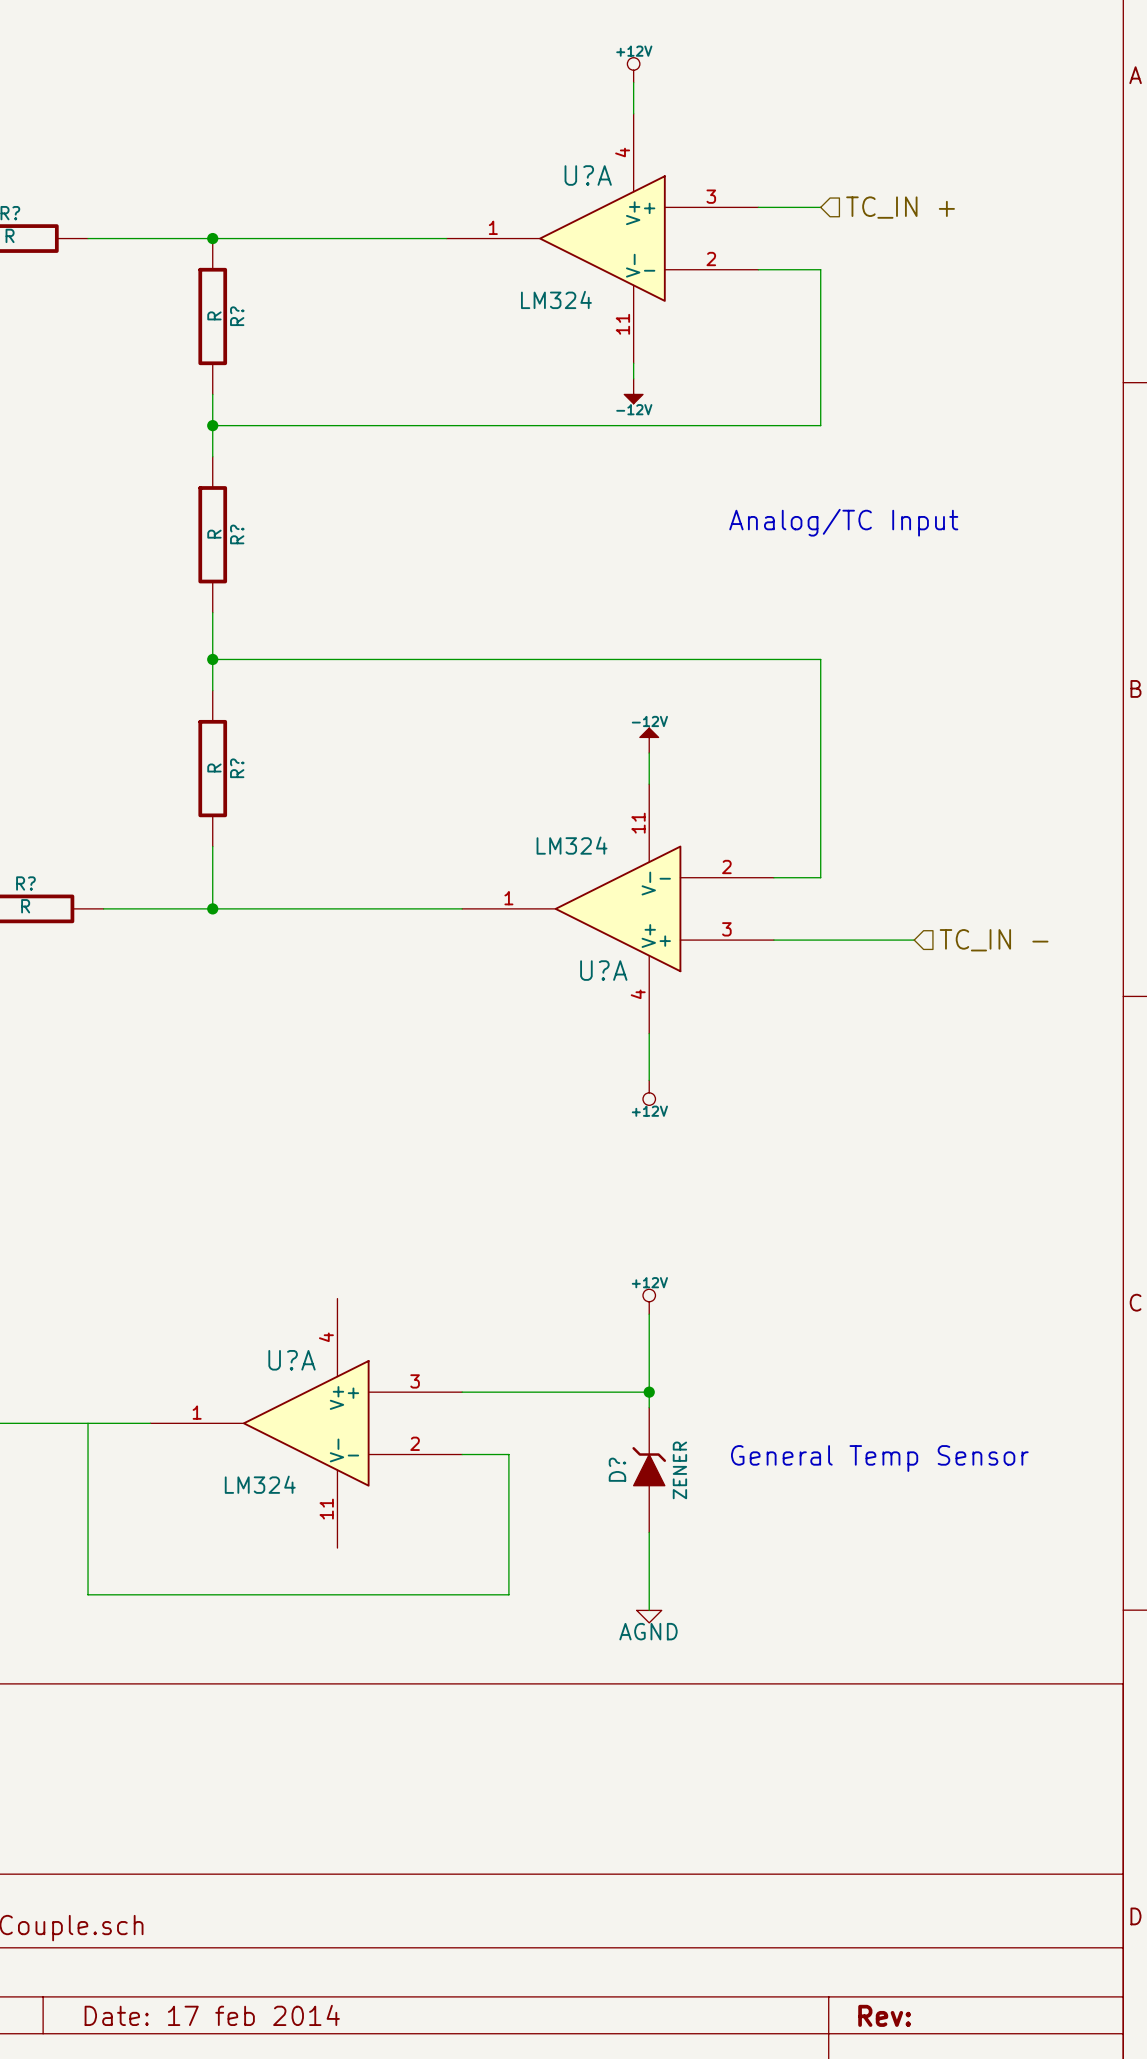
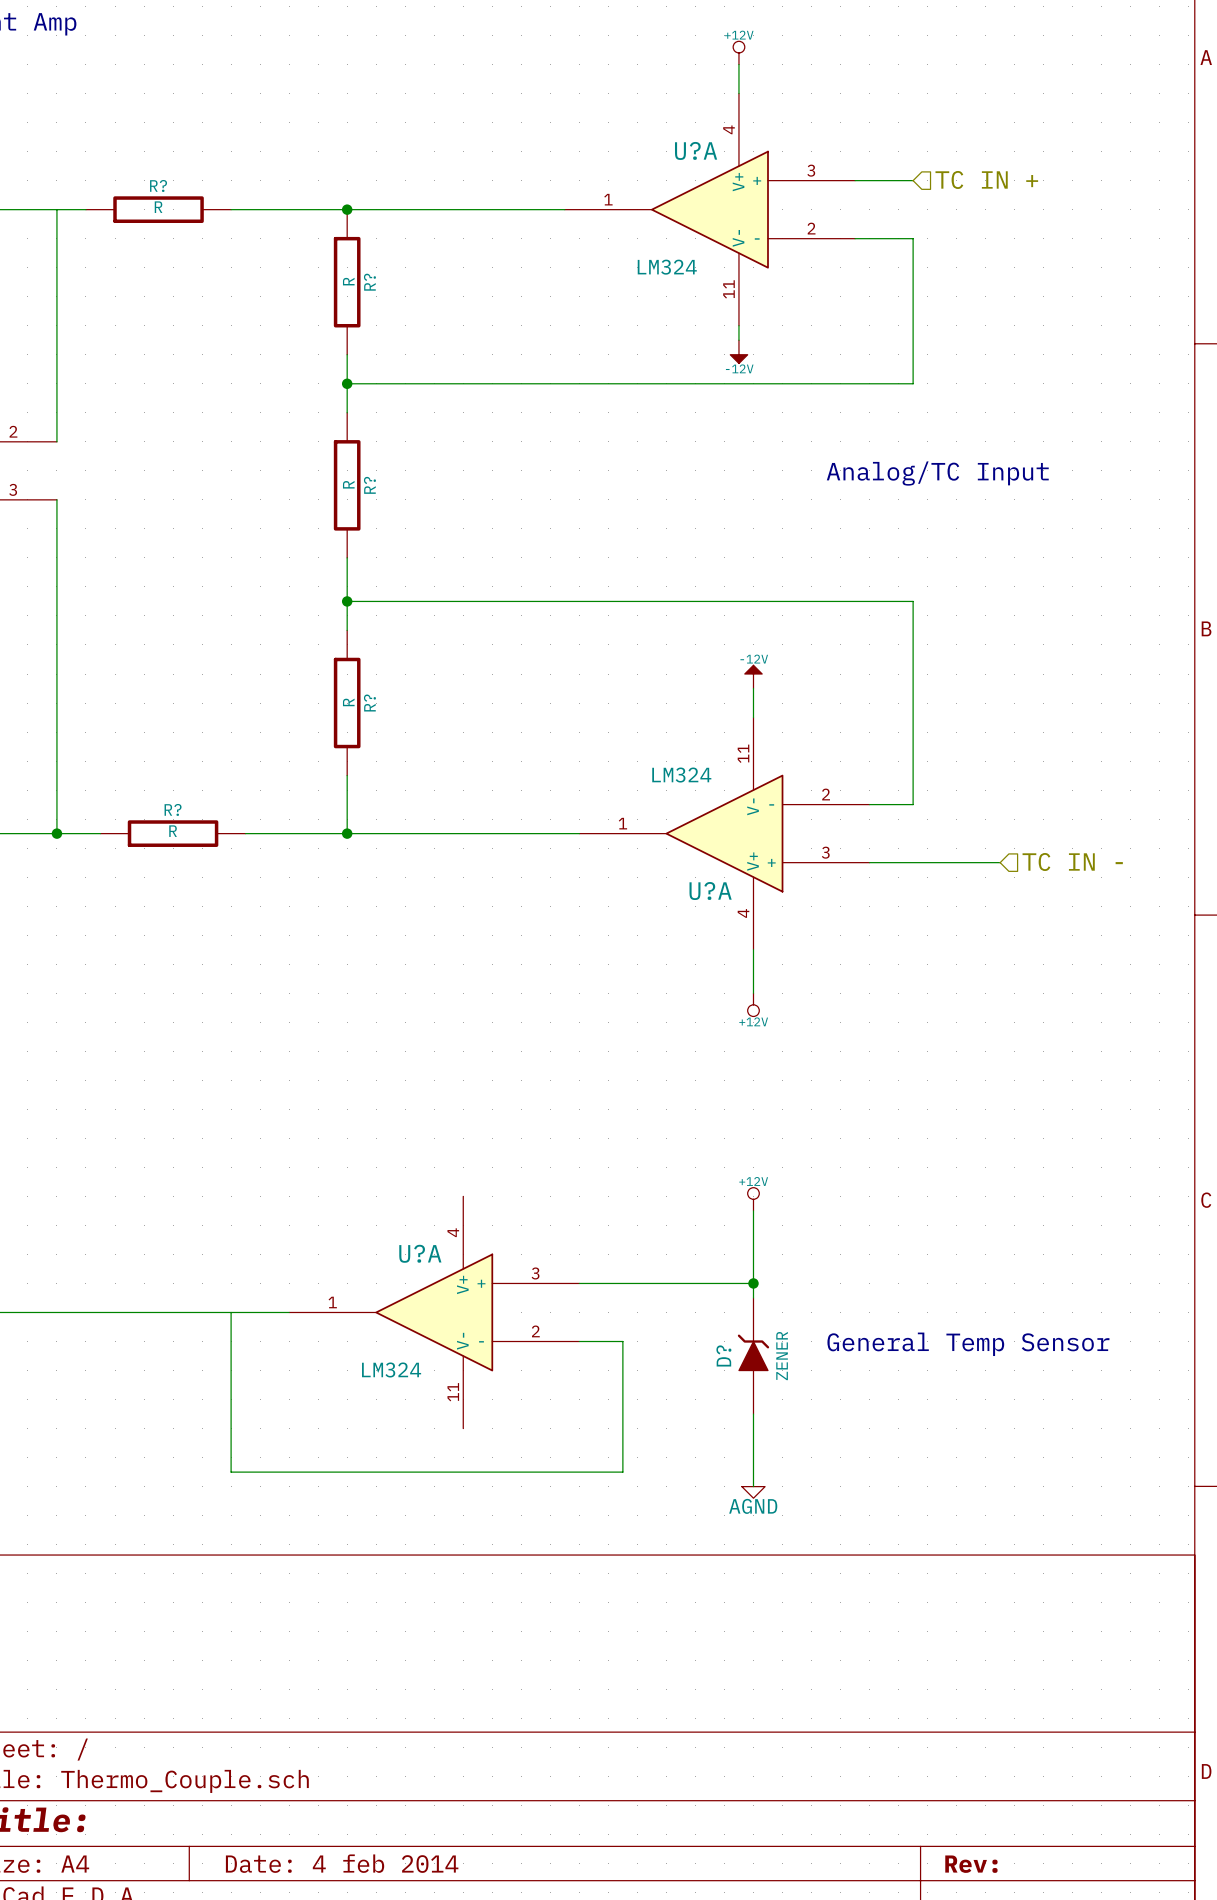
hierarchical label: TC_IN + (900, 207) -> TC IN + (986, 179)
hierarchical label: TC_IN - (994, 940) -> TC IN - (1072, 861)
title block: Date: 17 feb 2014 (212, 2015) -> Date: 4 feb 2014 (342, 1863)

